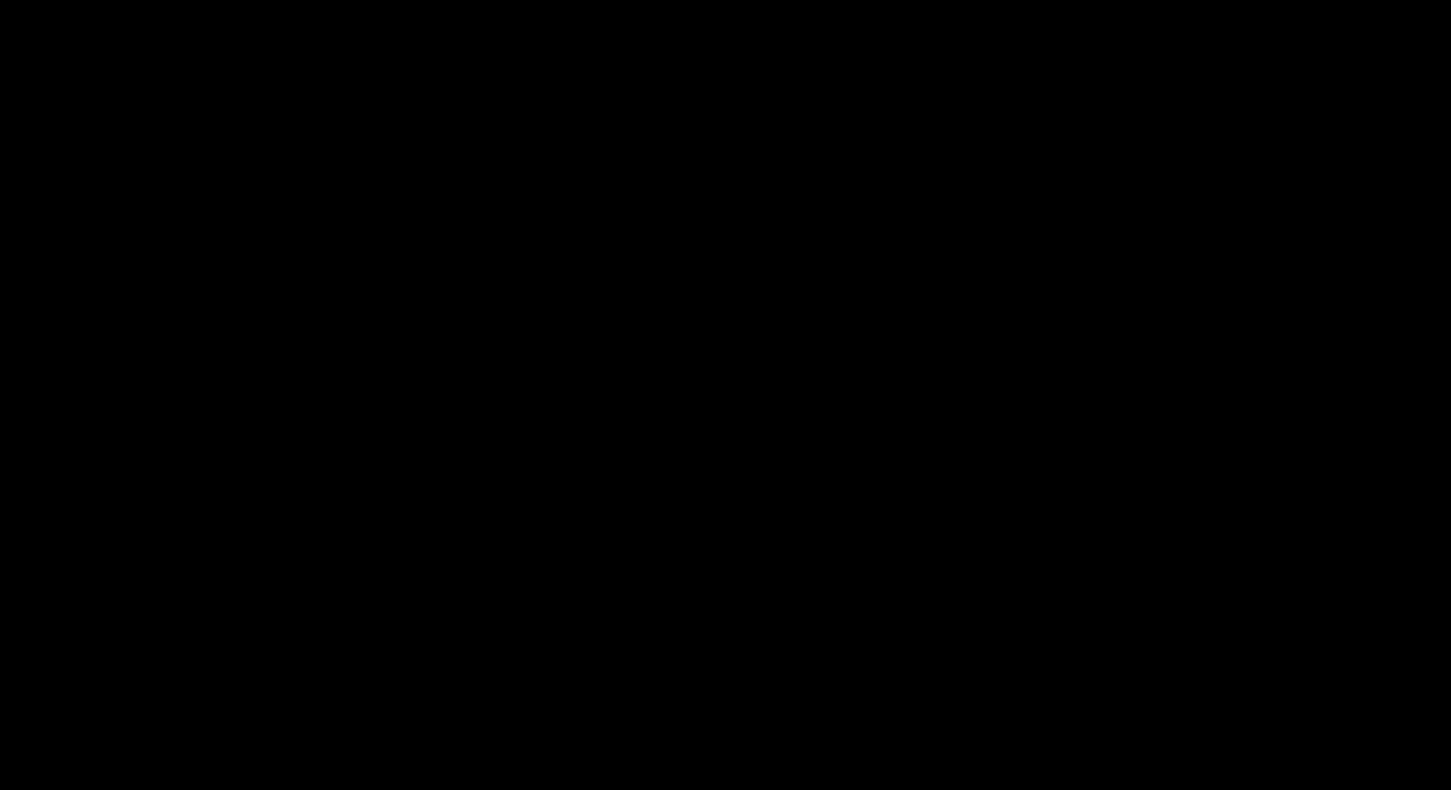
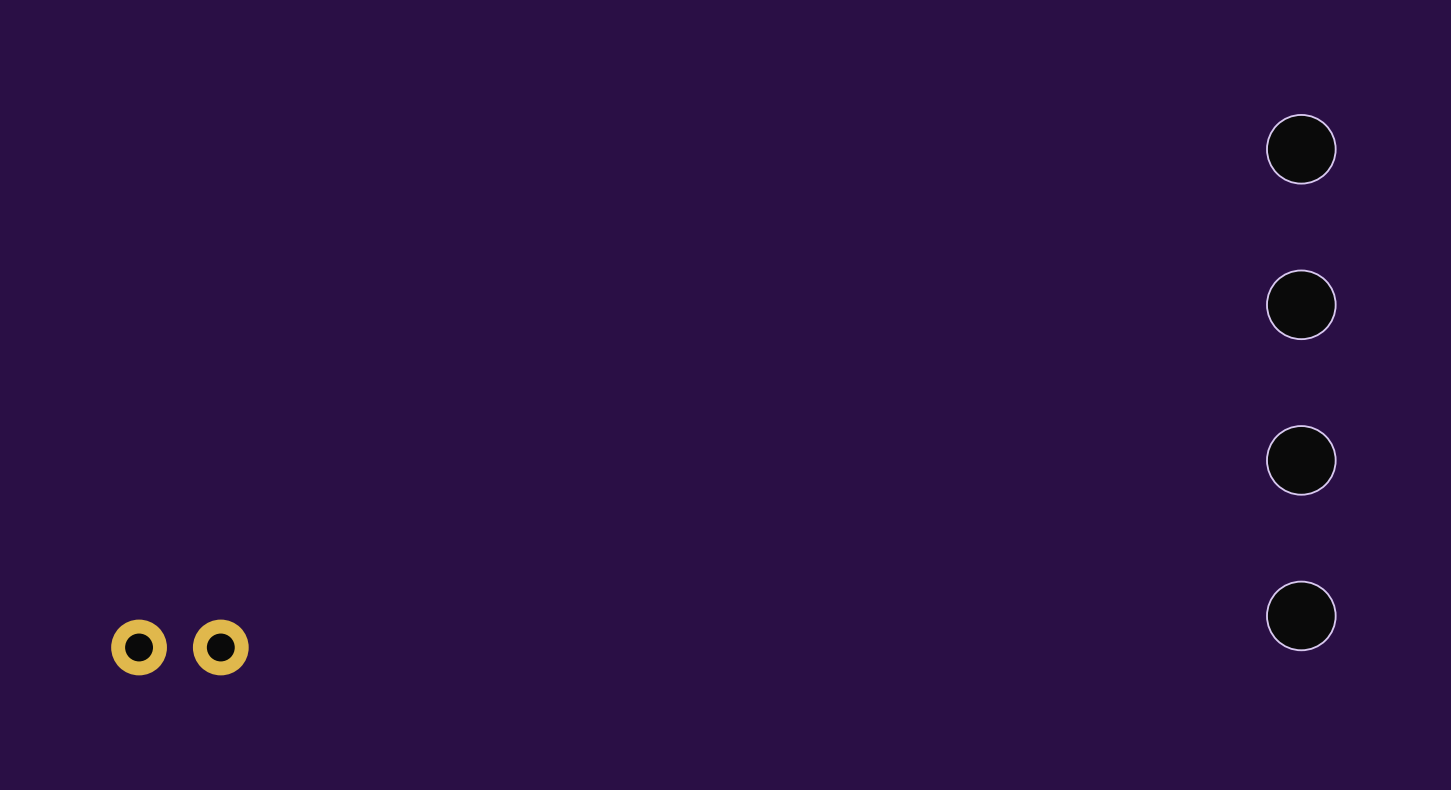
part: none -> (1301, 149)
part: none -> (1301, 304)
part: none -> (1301, 460)
part: none -> (1301, 615)
part: none -> (179, 647)

